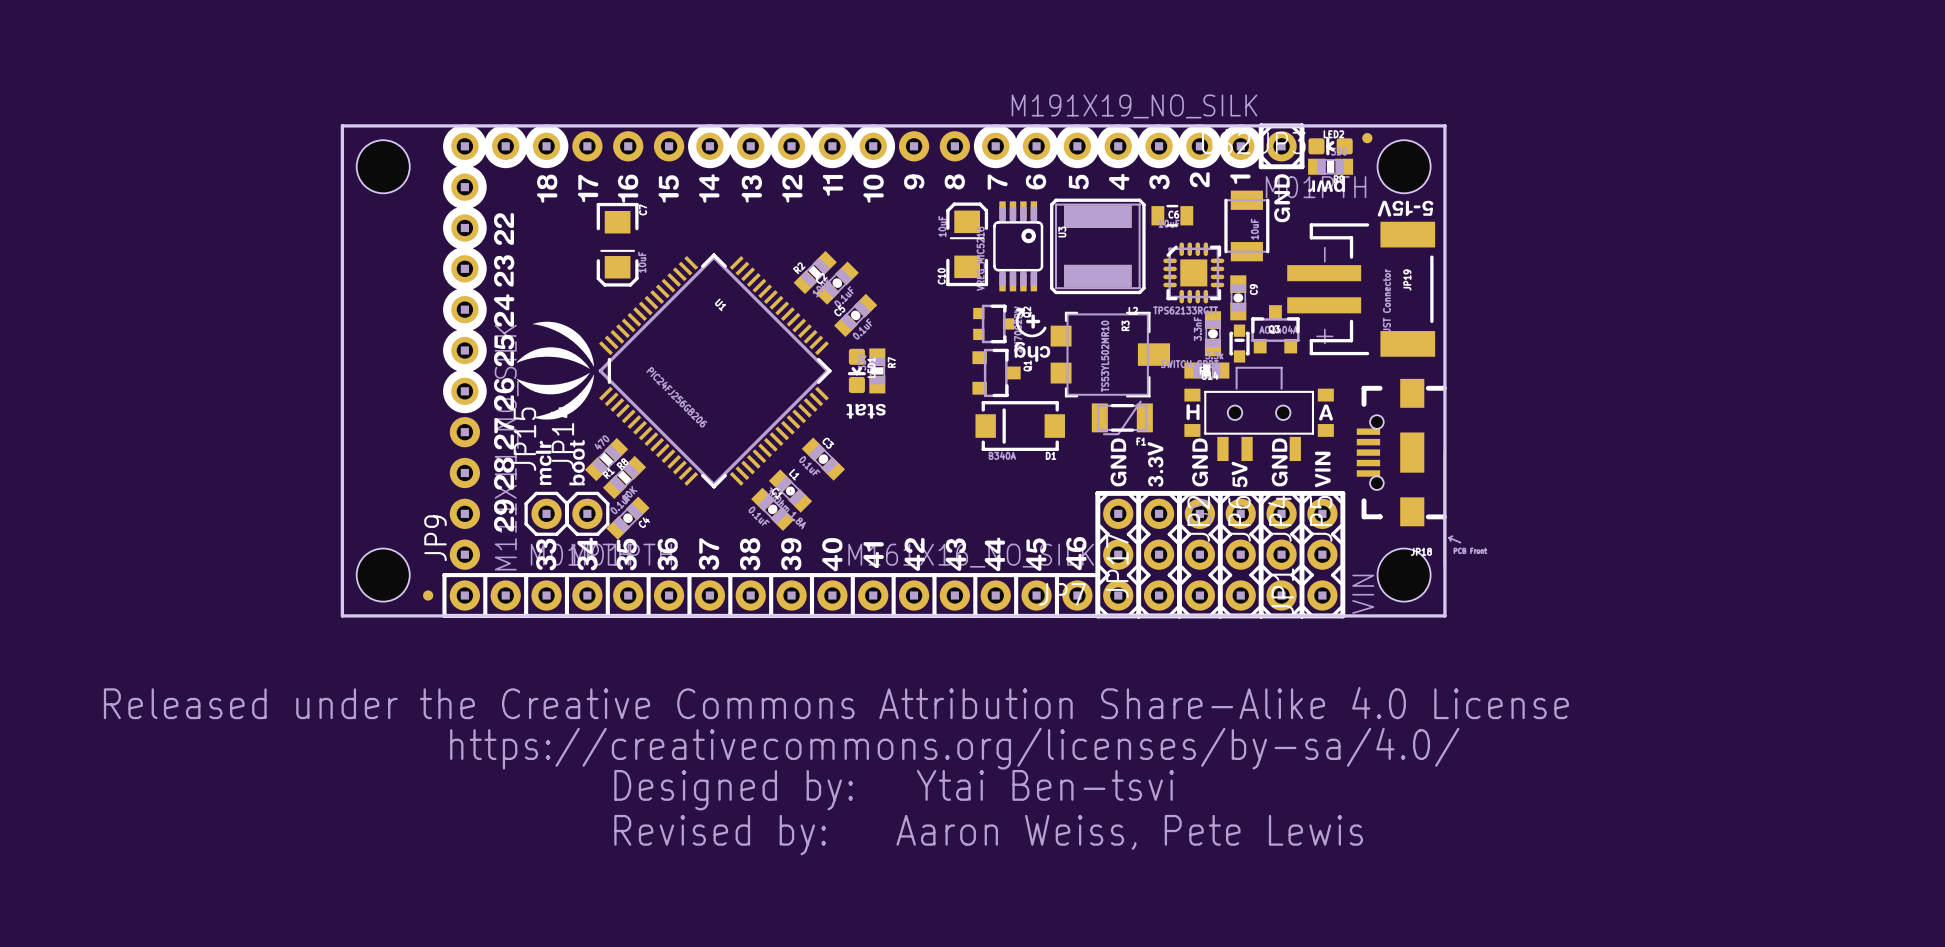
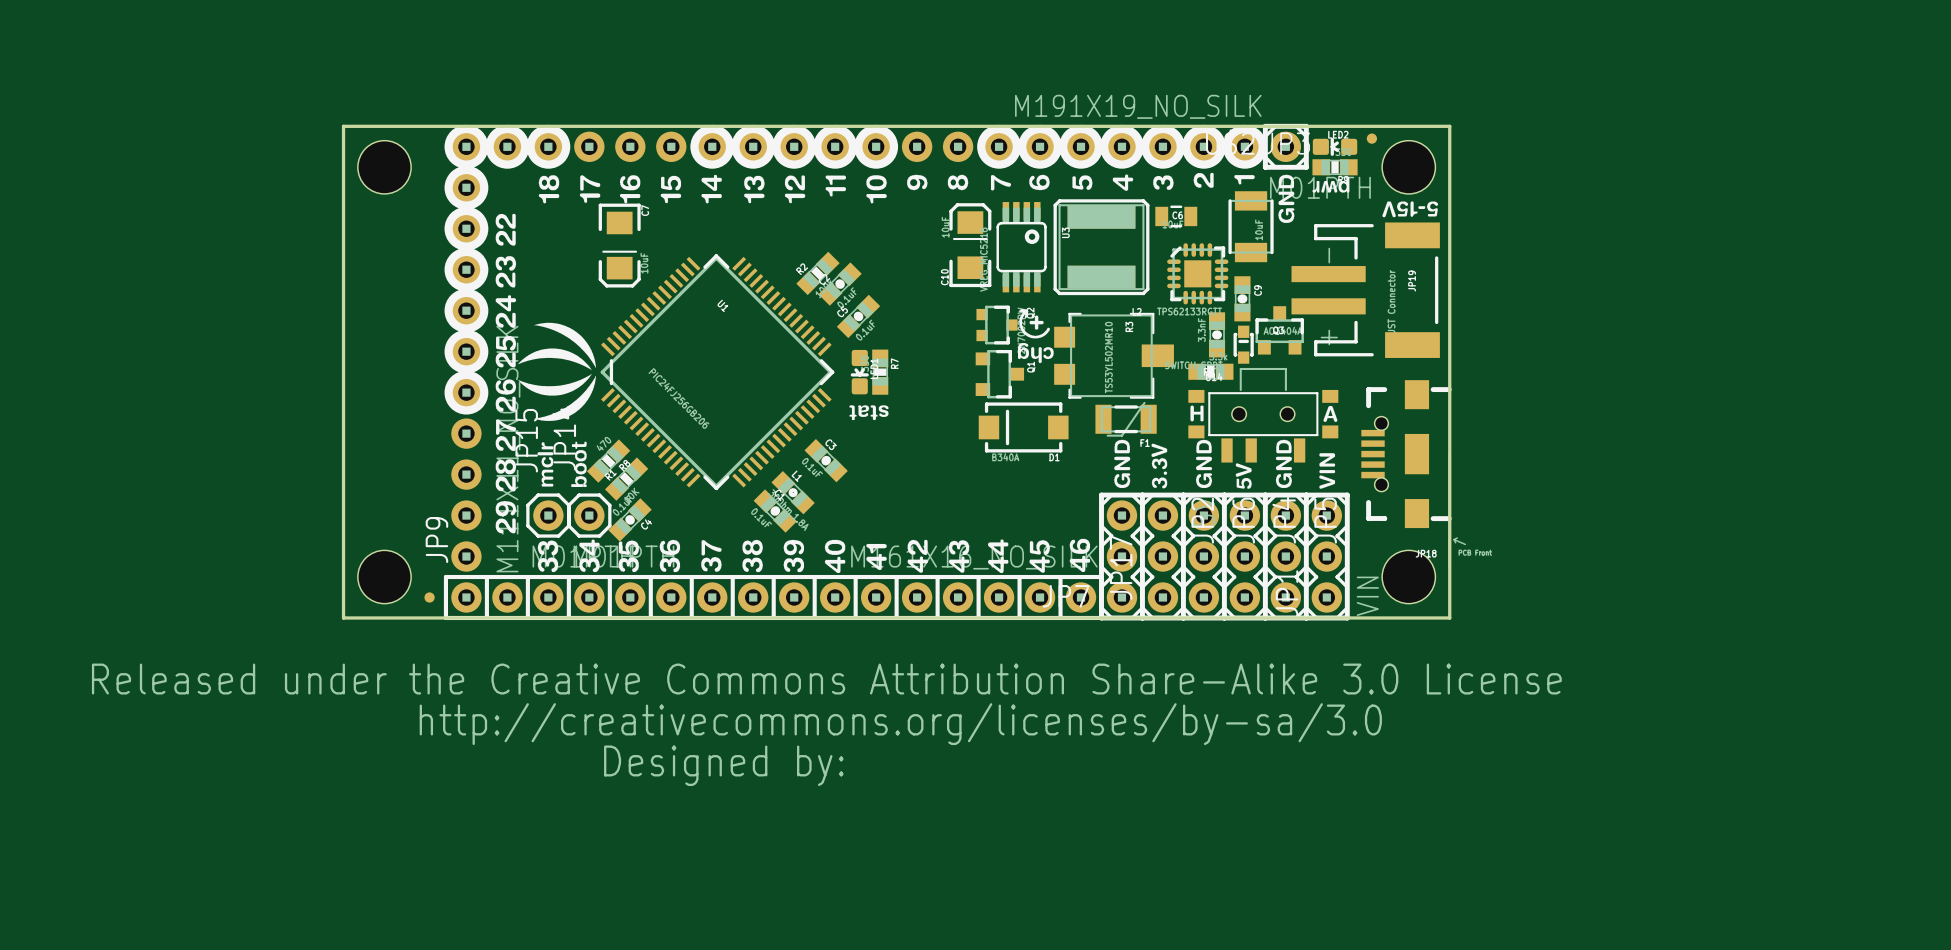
drawing: none -> [91, 663, 1562, 787]
drawing: [103, 686, 1569, 811] -> none
text: Ytai Ben-tsvi (1045, 785) -> none
text: Aaron Weiss, Pete Lewis (1129, 832) -> none
text: Revised by: (720, 835) -> none

